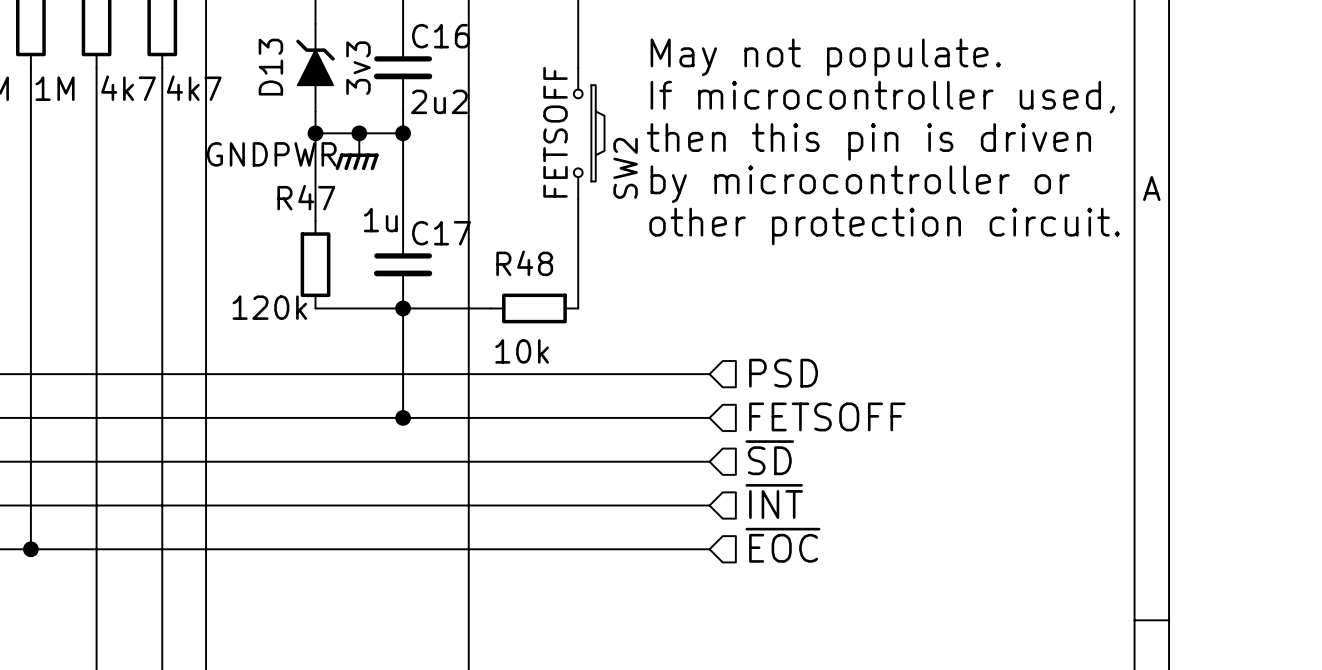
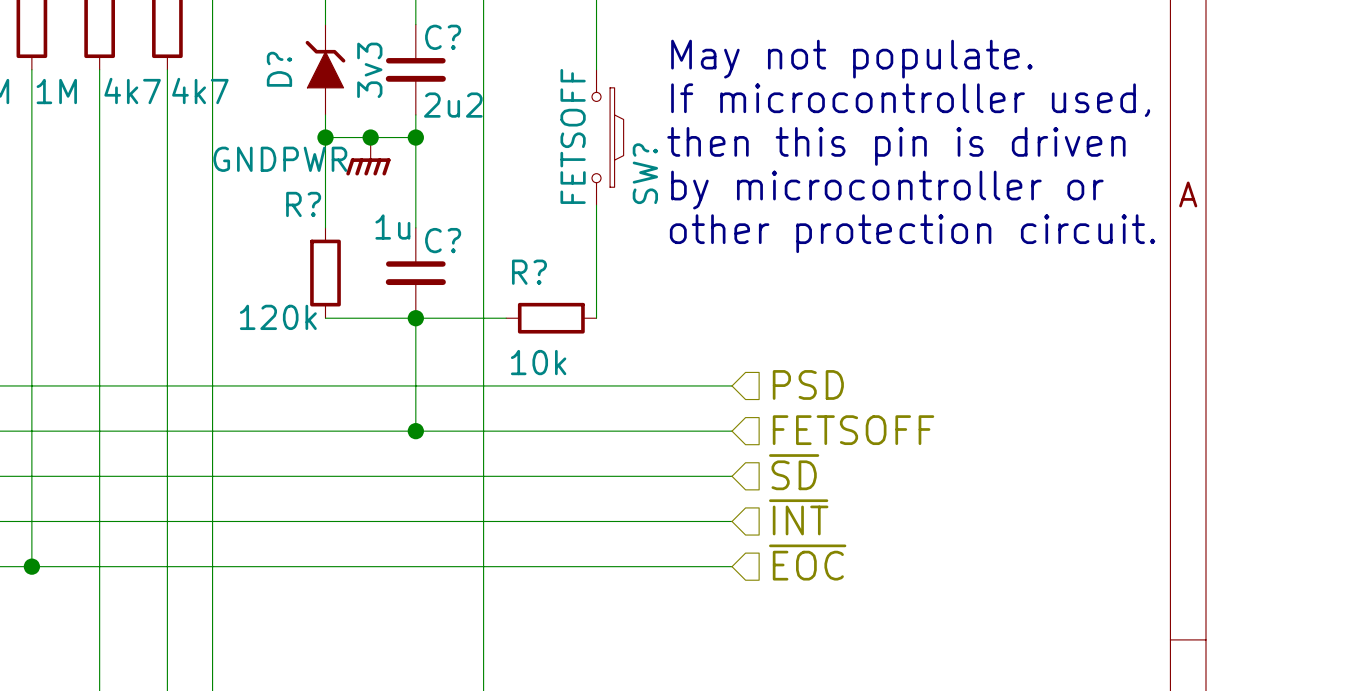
C16 name: C16 (440, 36) -> C? (443, 37)
D13 name: D13 (270, 67) -> D? (279, 69)
SW2 name: SW2 (625, 168) -> SW? (645, 173)
R47 name: R47 (306, 197) -> R? (303, 204)
C17 name: C17 (441, 233) -> C? (443, 240)
R48 name: R48 (524, 263) -> R? (529, 272)

